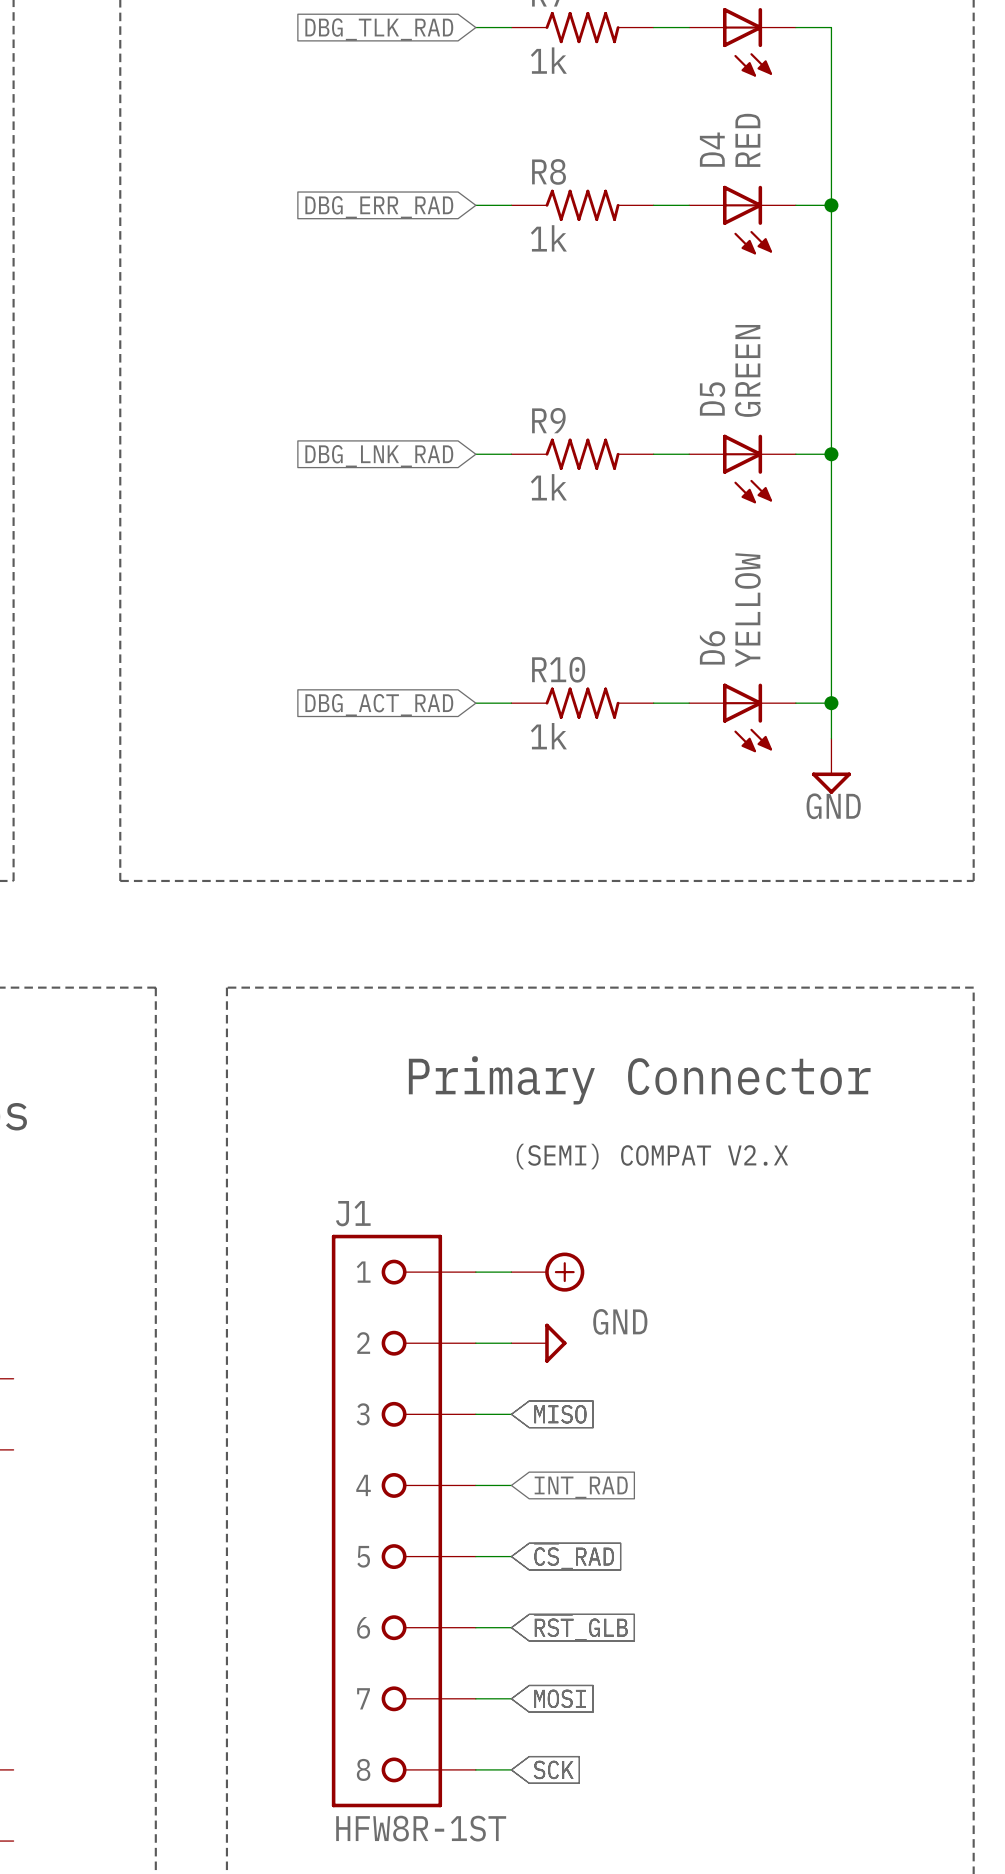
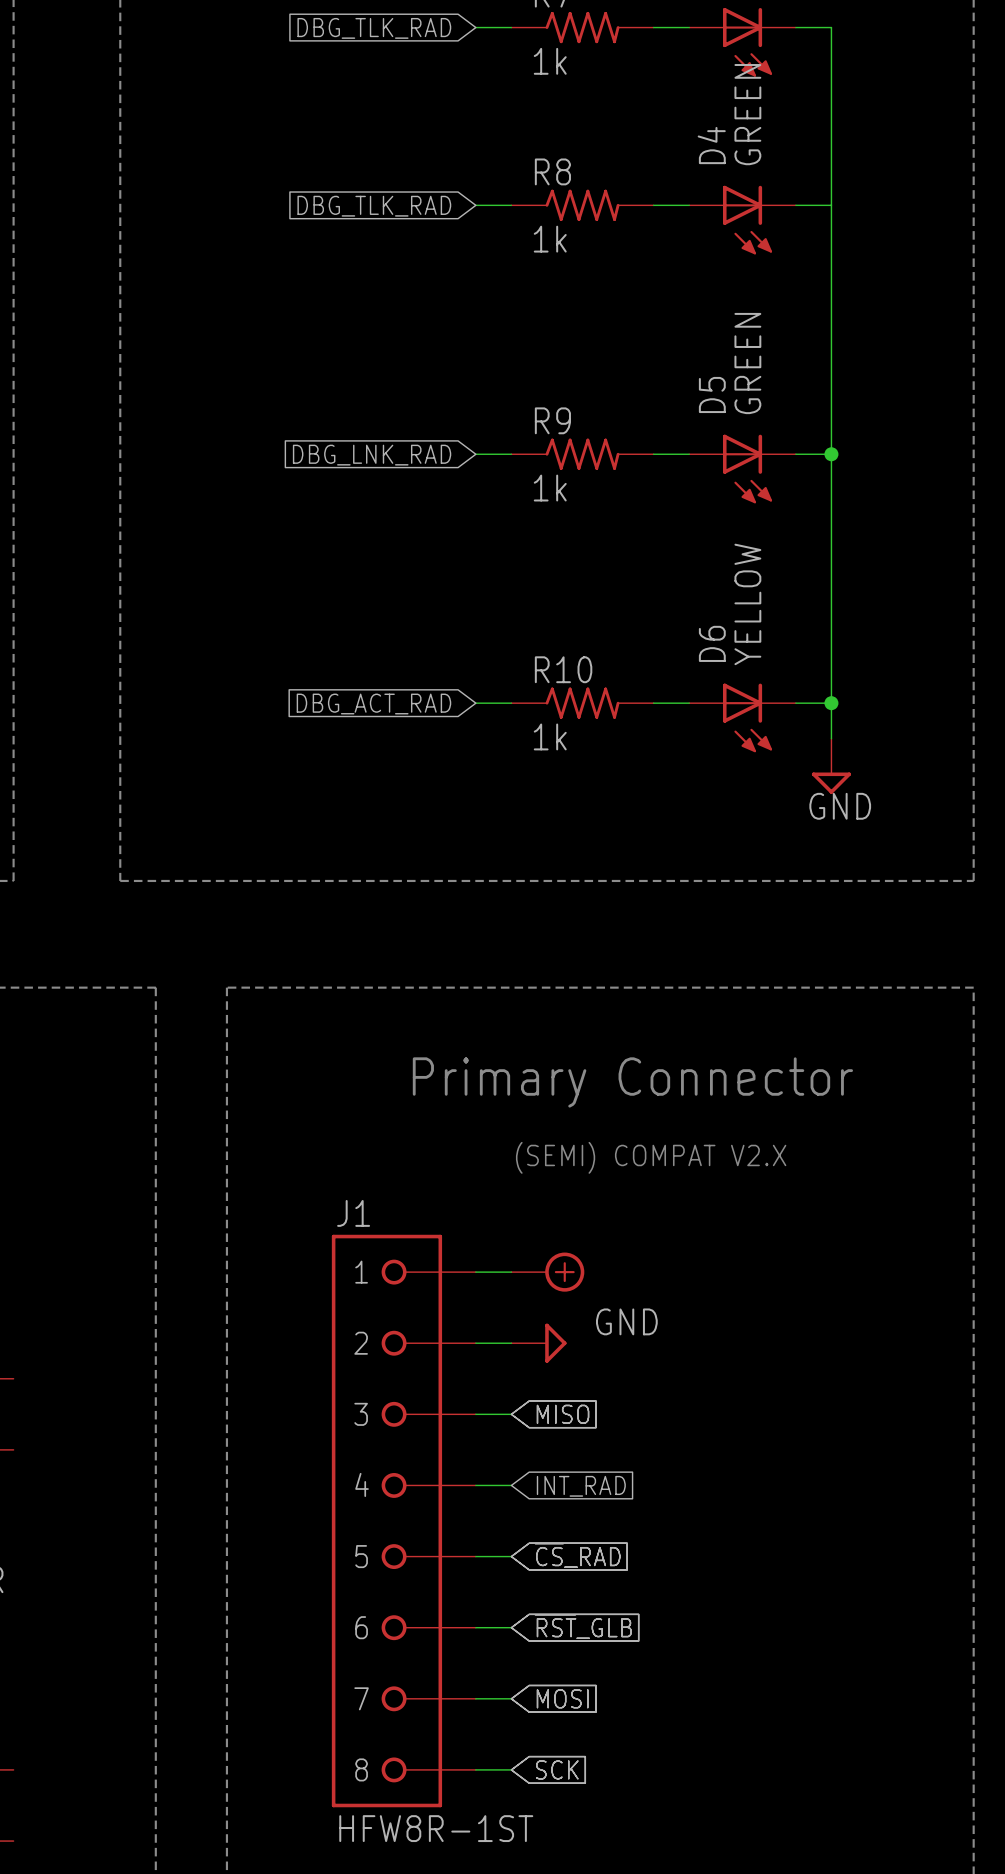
D4 value: RED (747, 140) -> GREEN (747, 114)
junction: (831, 205) -> none
global label: DBG_ERR_RAD (379, 207) -> DBG_TLK_RAD (374, 206)

